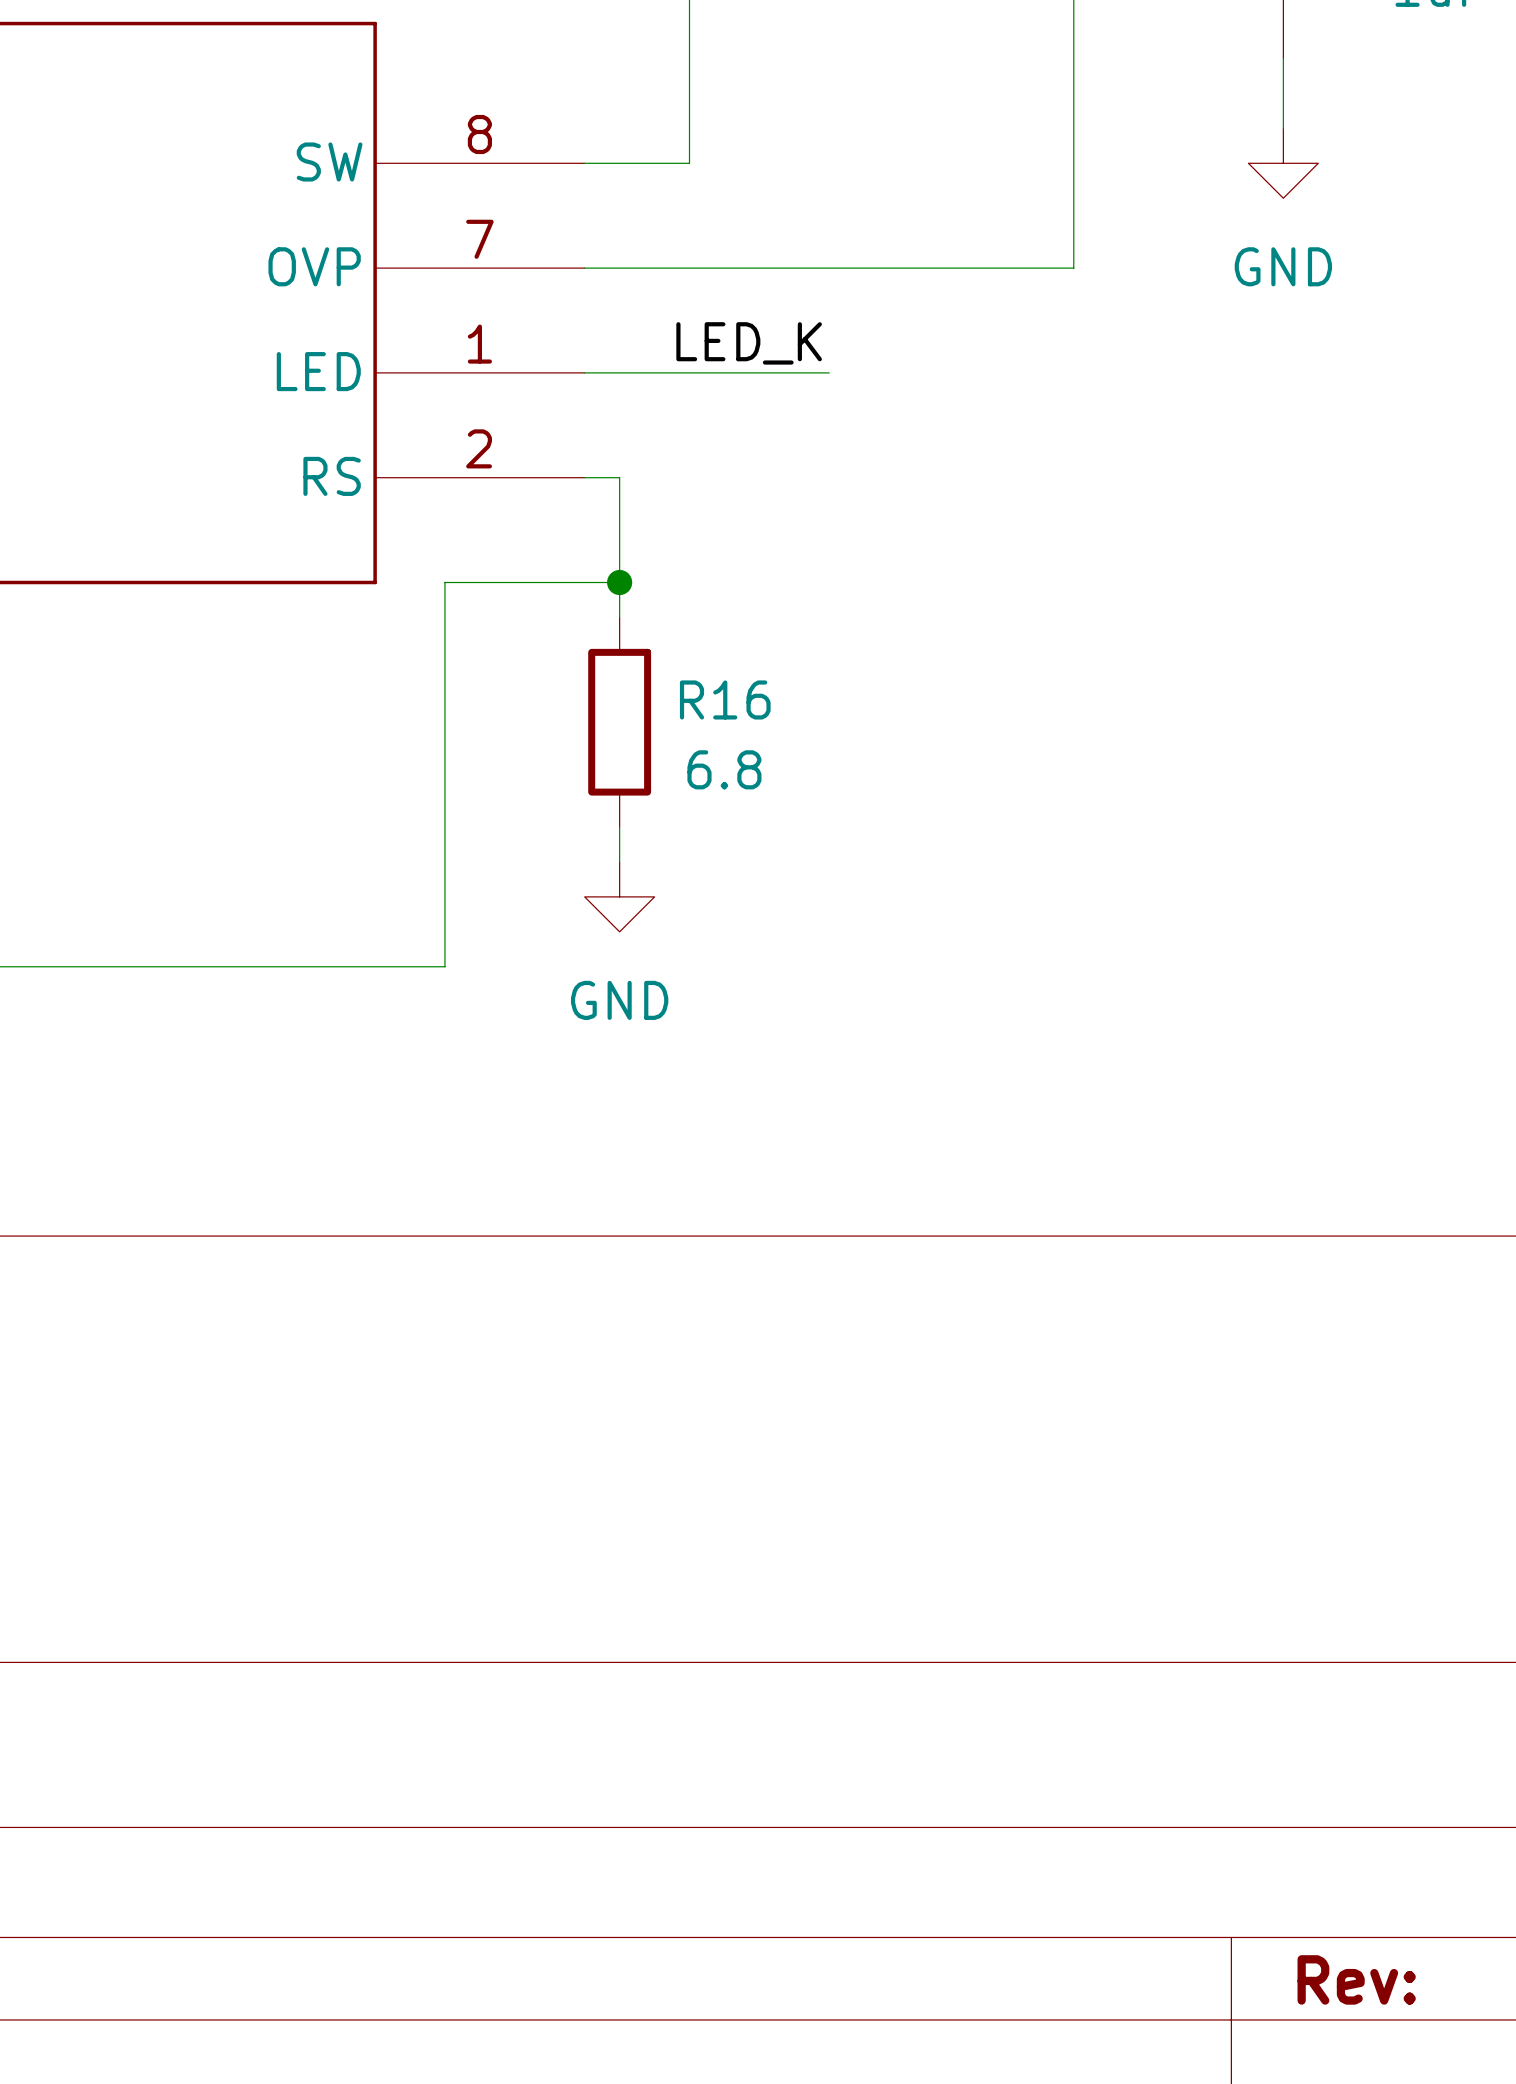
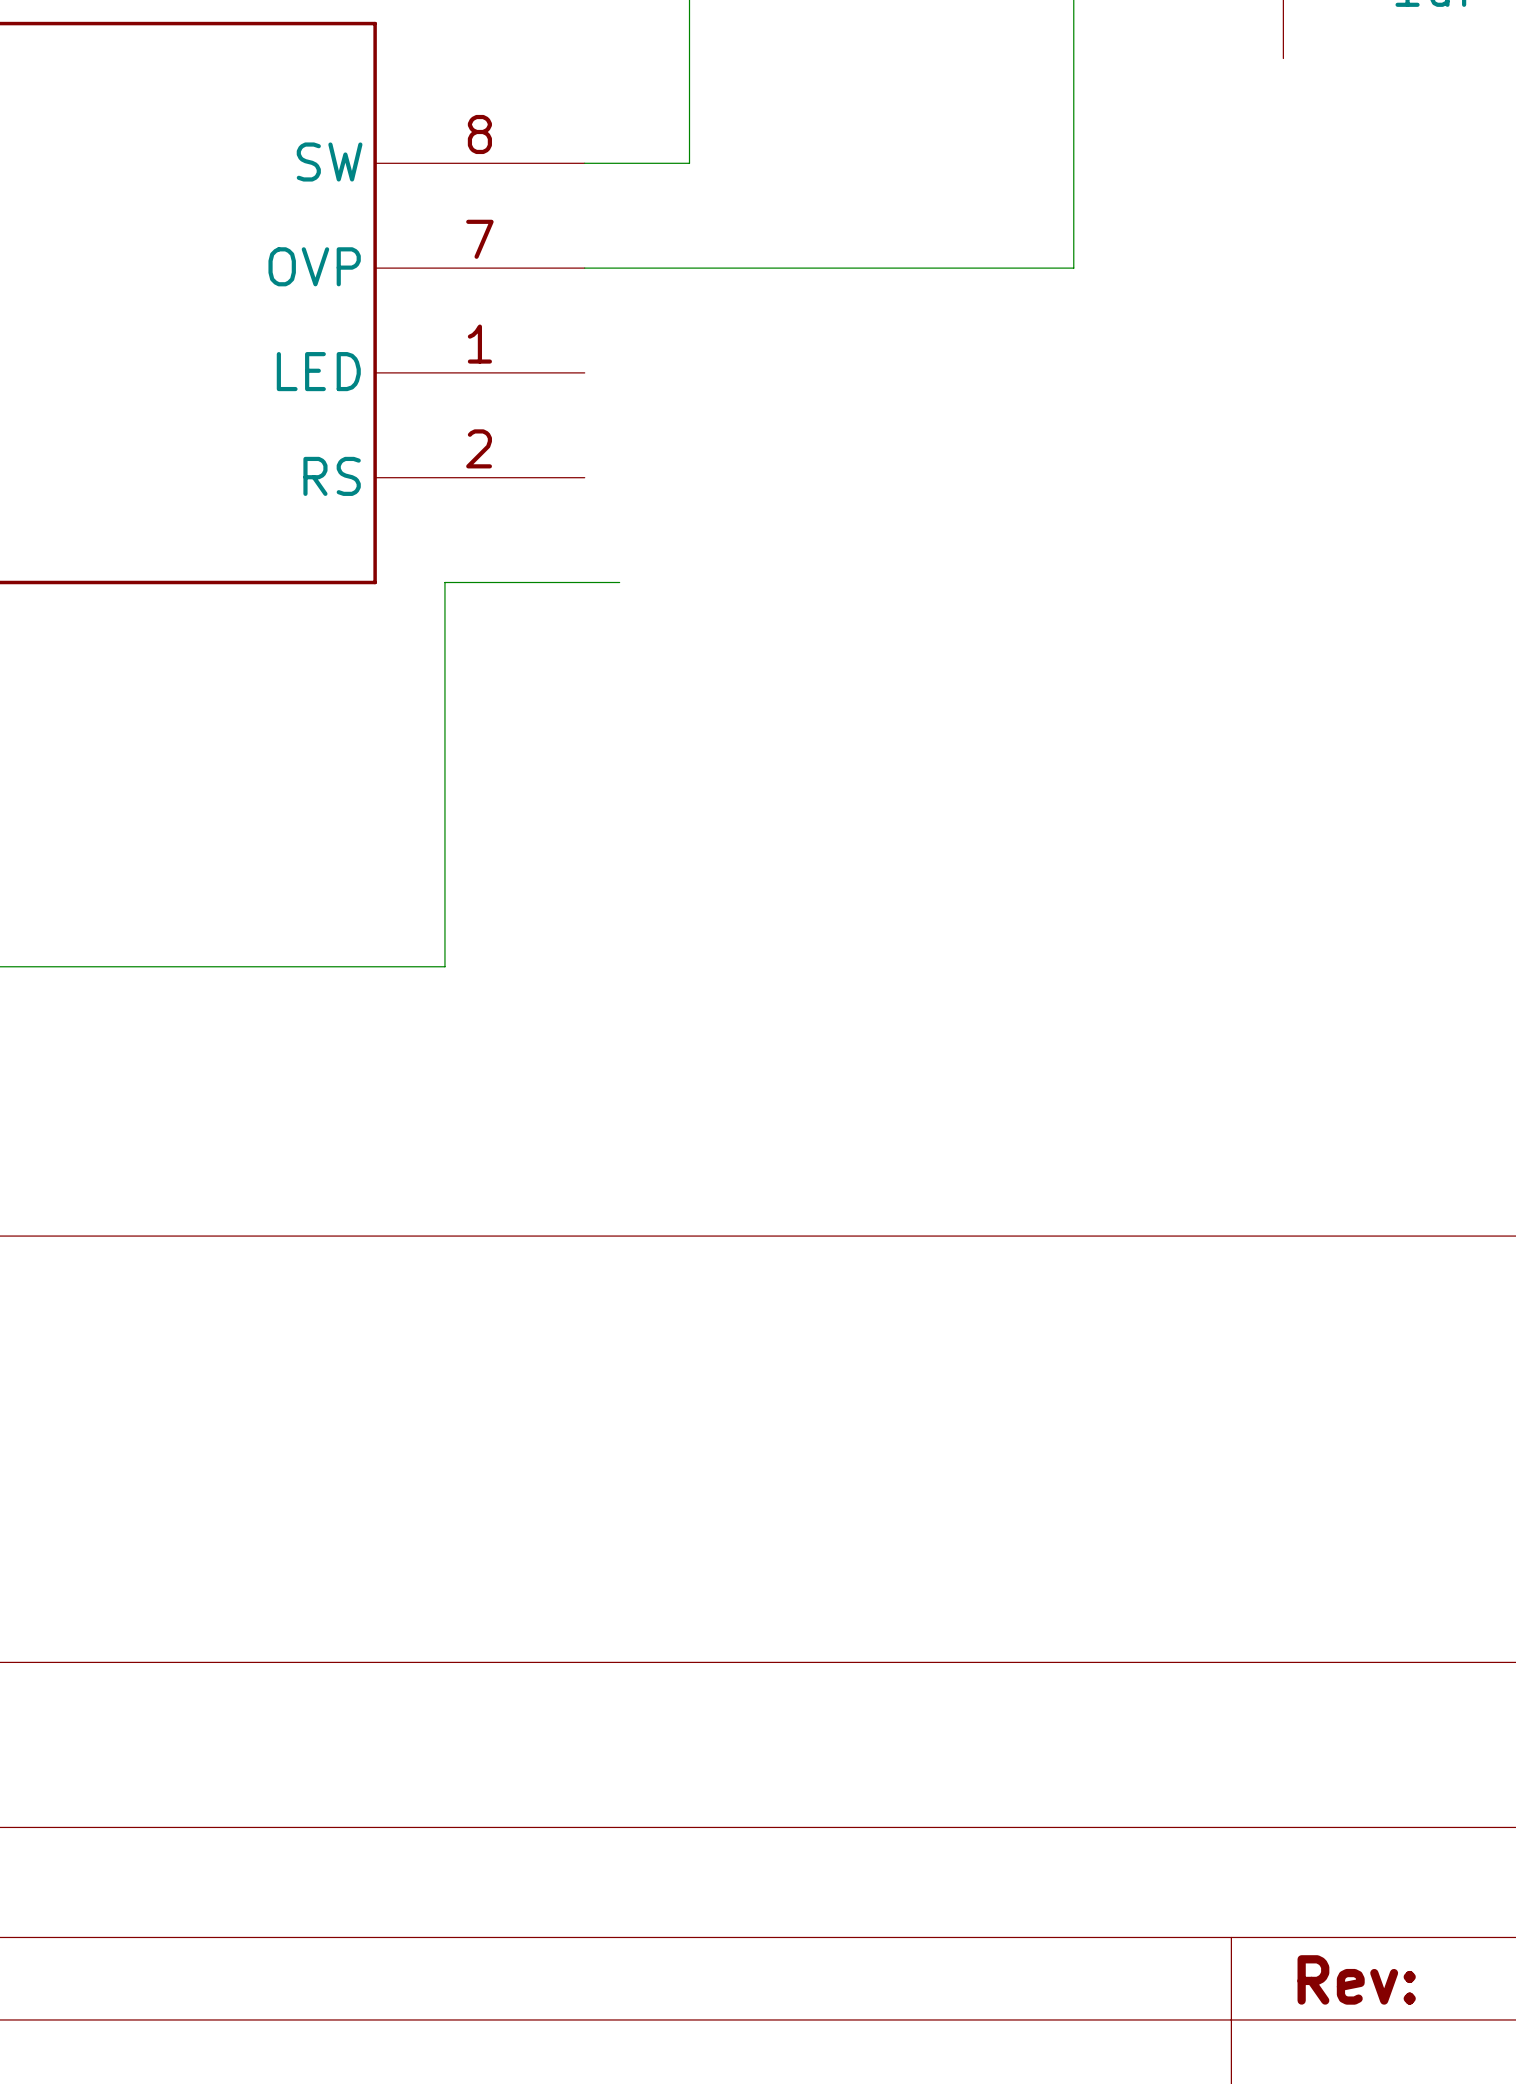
wire: (1283, 58) (1283, 128) -> none
power symbol: GND (1283, 163) -> none
label: LED_K (749, 343) -> none
wire: (584, 372) (829, 372) -> none
wire: (584, 477) (619, 477) (619, 617) -> none
junction: (619, 582) -> none
R16: 6.8 (619, 722) -> none
wire: (619, 827) (619, 861) -> none
power symbol: GND (619, 896) -> none

